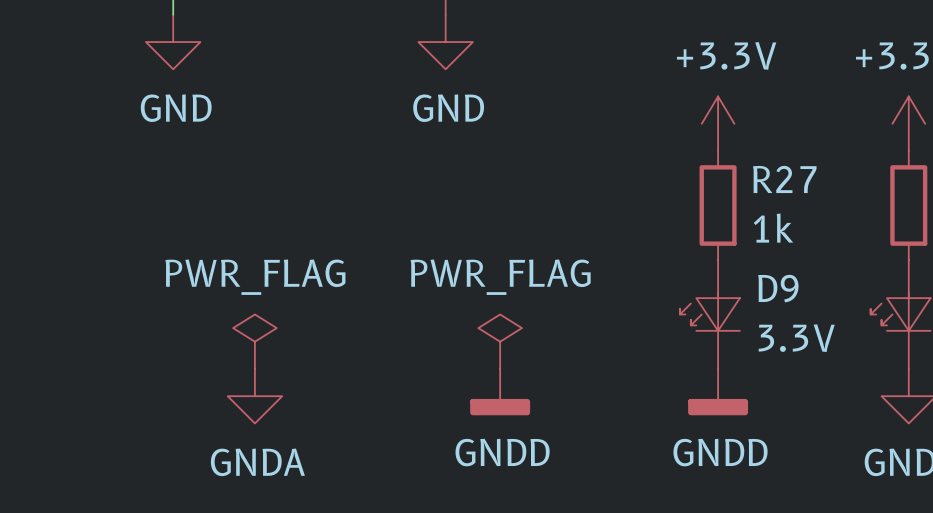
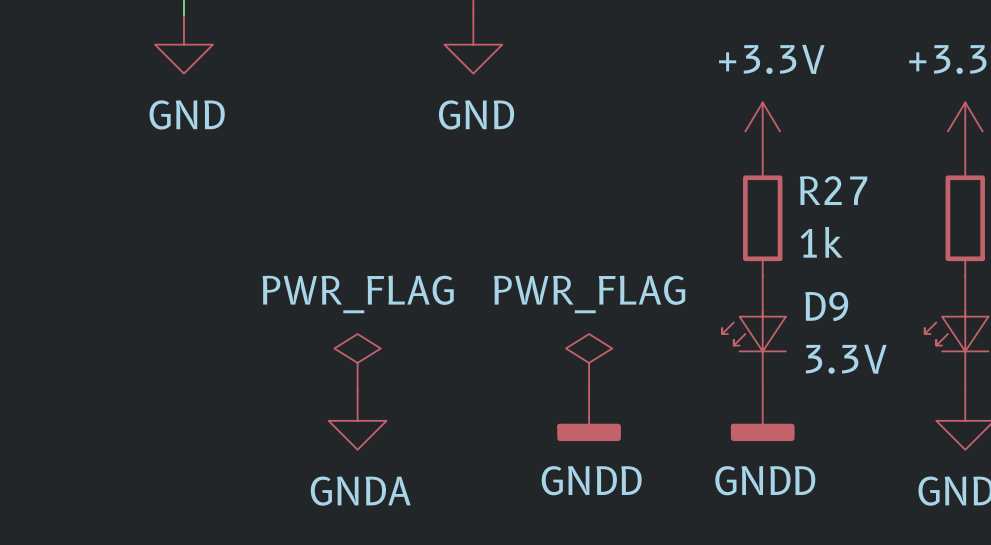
power symbol: PWR_FLAG (254, 341) -> none
power symbol: none -> PWR_FLAG (357, 362)
power symbol position: PWR_FLAG (500, 341) -> PWR_FLAG (589, 362)
power symbol position: GNDD (500, 392) -> GNDD (589, 416)
power symbol position: GNDA (254, 396) -> GNDA (357, 420)

